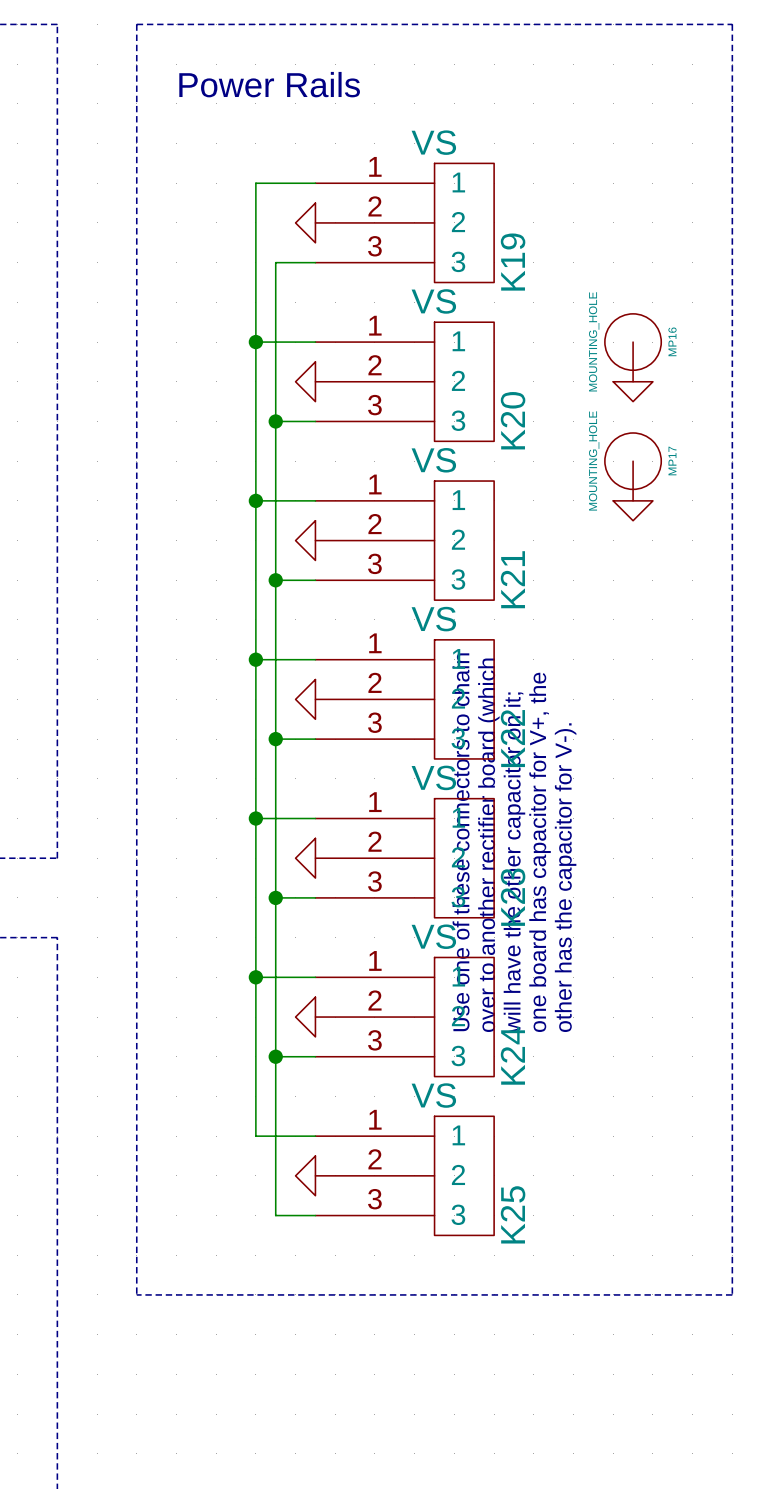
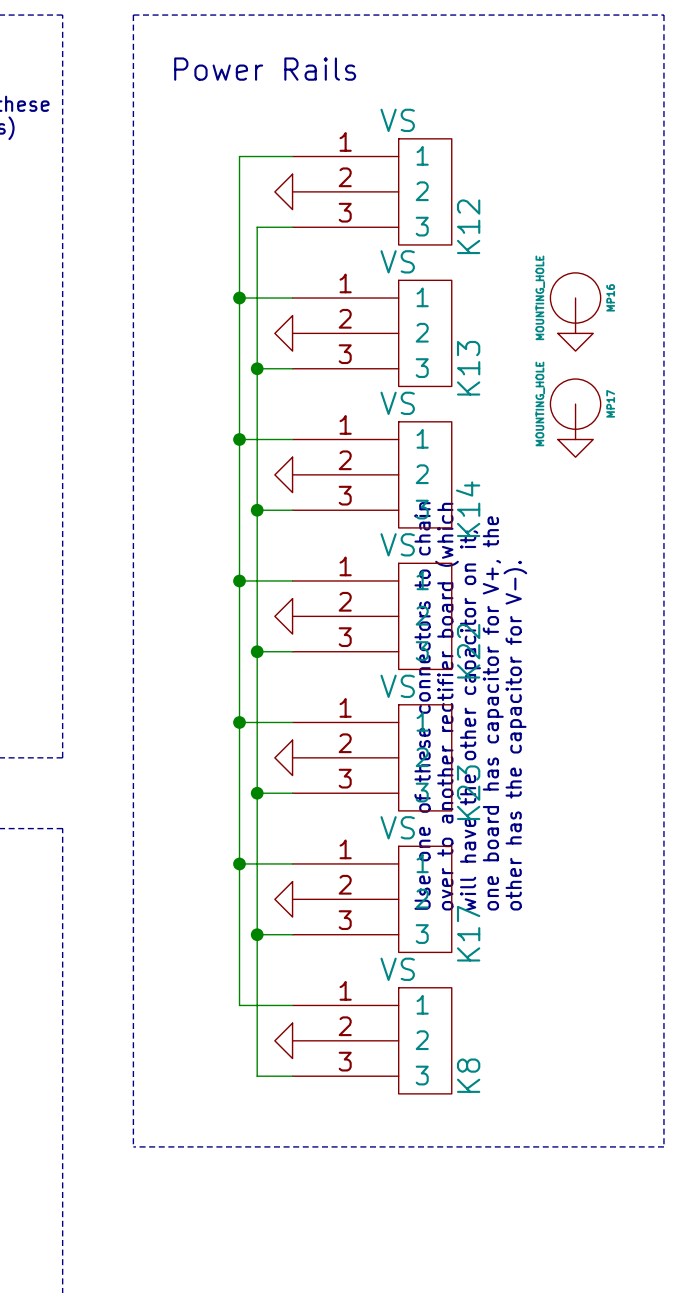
K19 name: K19 (513, 262) -> K12 (468, 226)
K20 name: K20 (513, 420) -> K13 (468, 368)
K21 name: K21 (512, 579) -> K14 (468, 509)
K24 name: K24 (512, 1055) -> K17 (468, 933)
K25 name: K25 (513, 1214) -> K8 (468, 1075)

